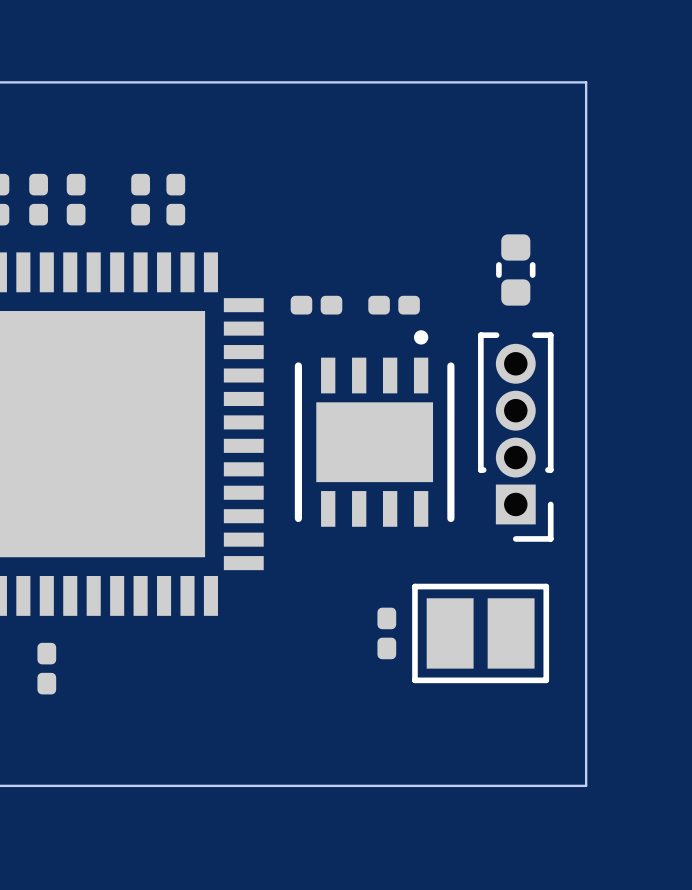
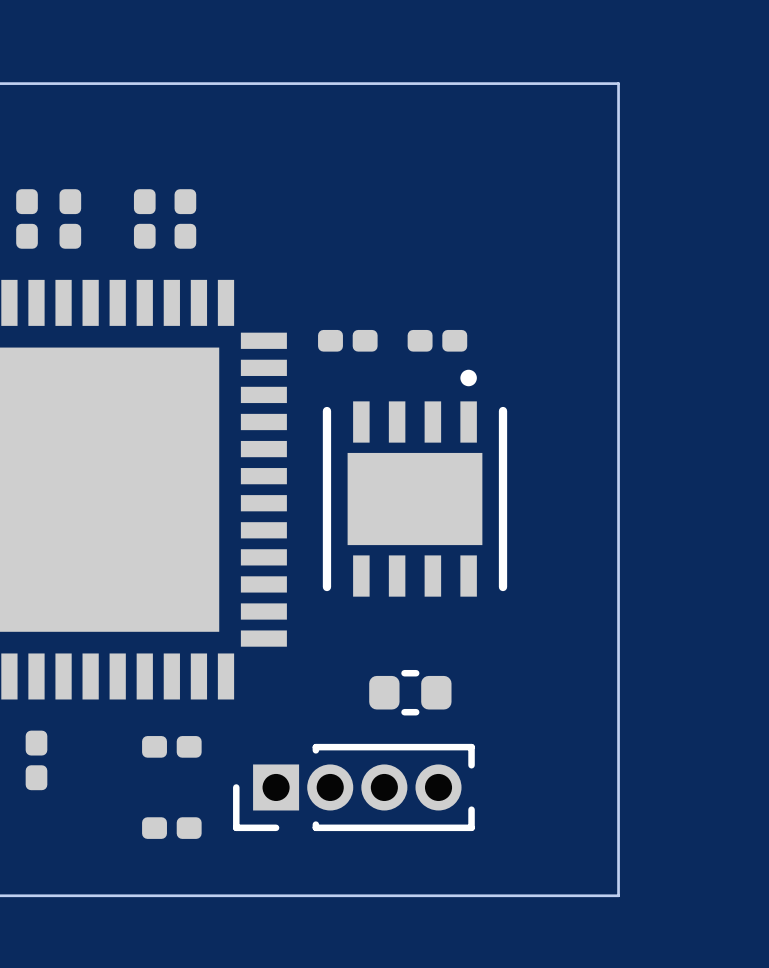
board edge: (550, 82) (586, 82) (586, 785) (550, 785) -> (618, 83) (618, 895)
part: (515, 269) -> none
part rotation: 0° (515, 437) -> 90° clockwise (353, 787)
part position: (515, 437) -> (353, 787)
part footprint: [377, 607, 397, 660] -> [369, 669, 452, 716]
part: (480, 633) -> none
part: none -> (171, 746)
part: none -> (171, 828)

